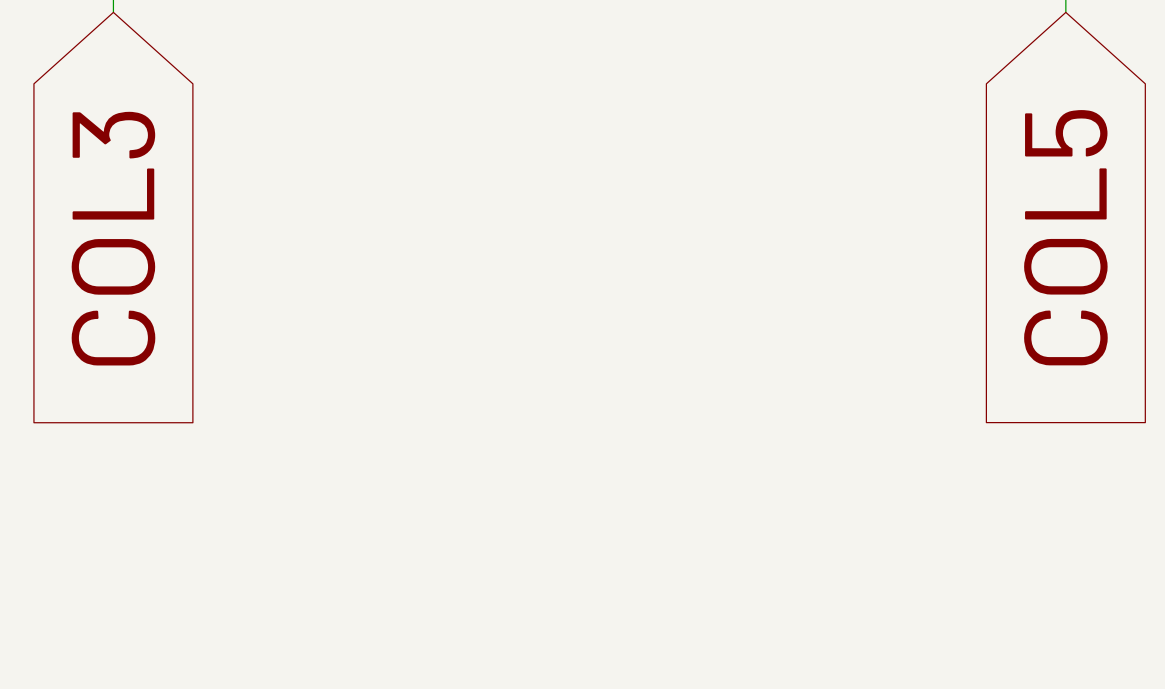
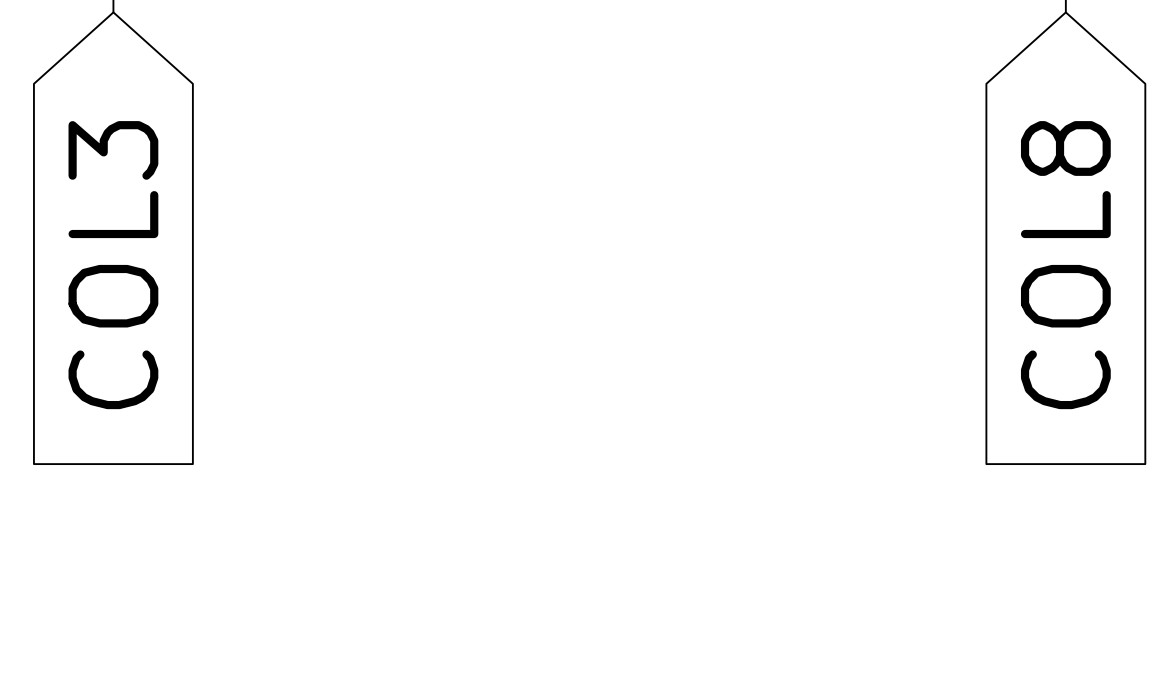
global label: COL5 (1065, 237) -> COL8 (1065, 265)

